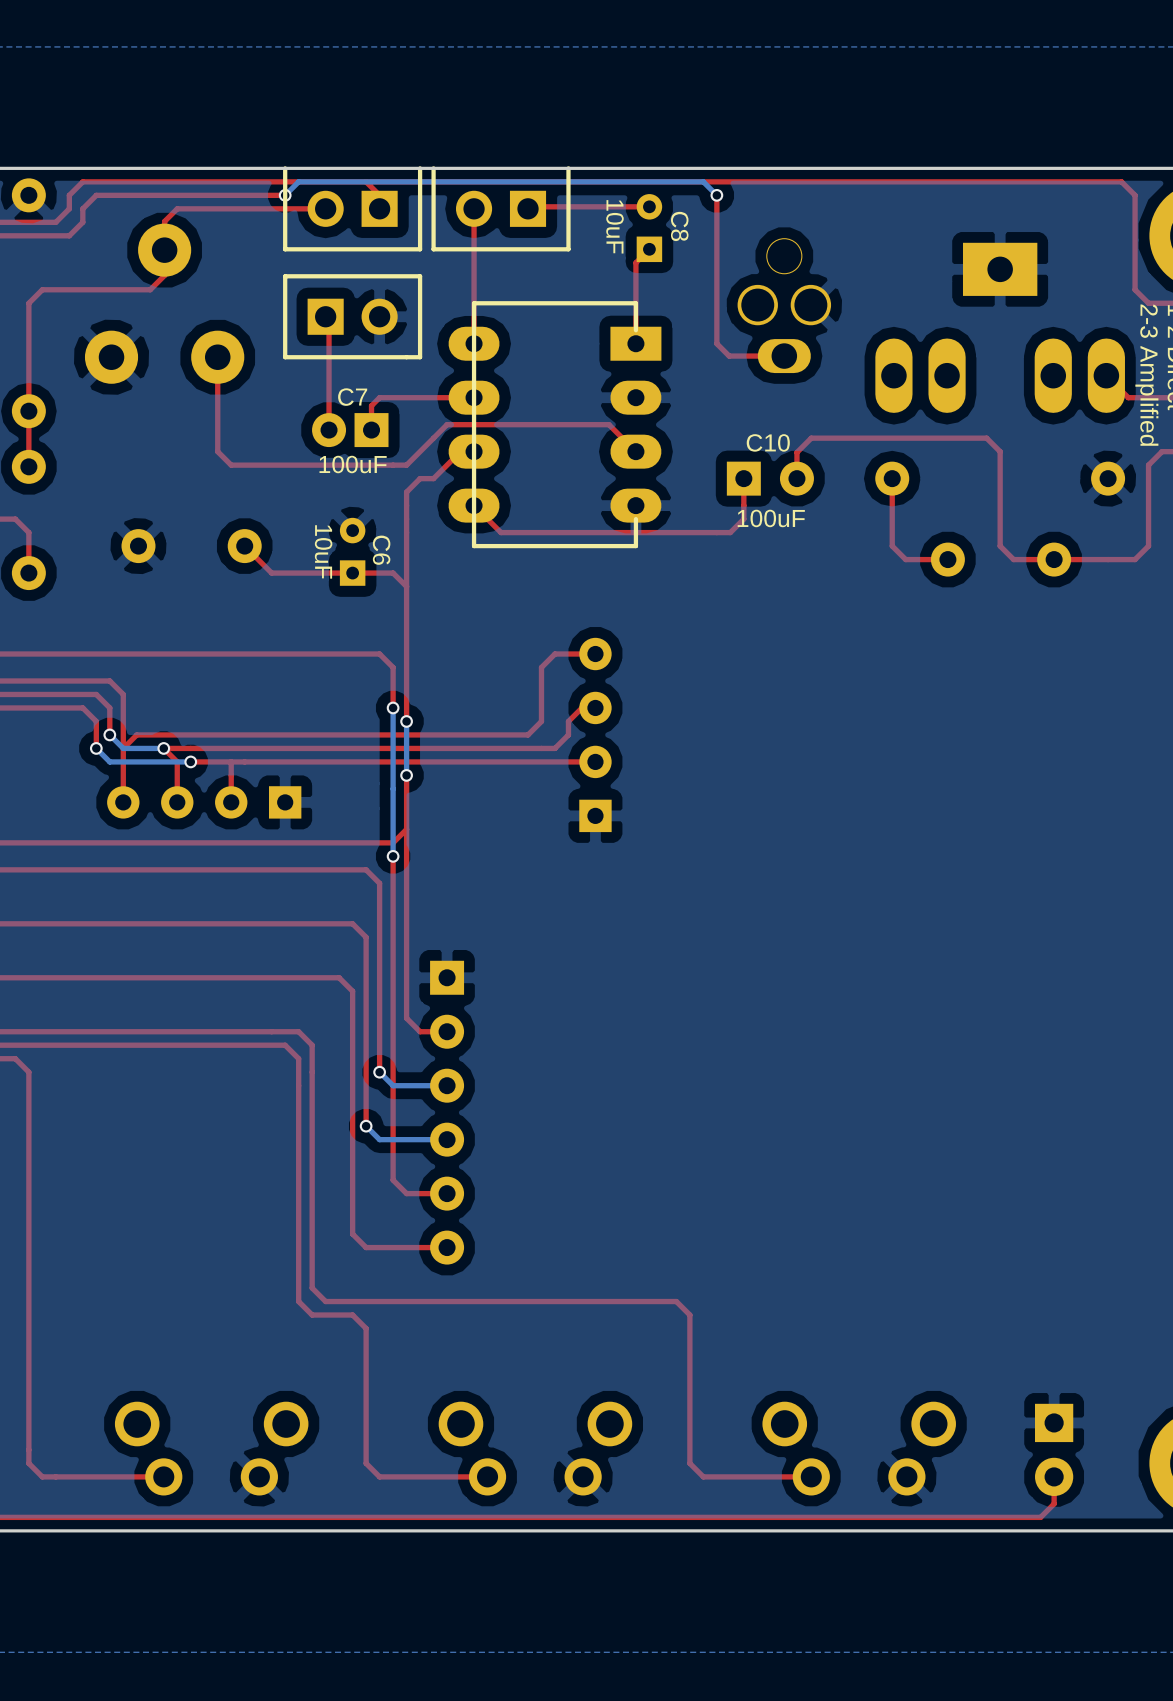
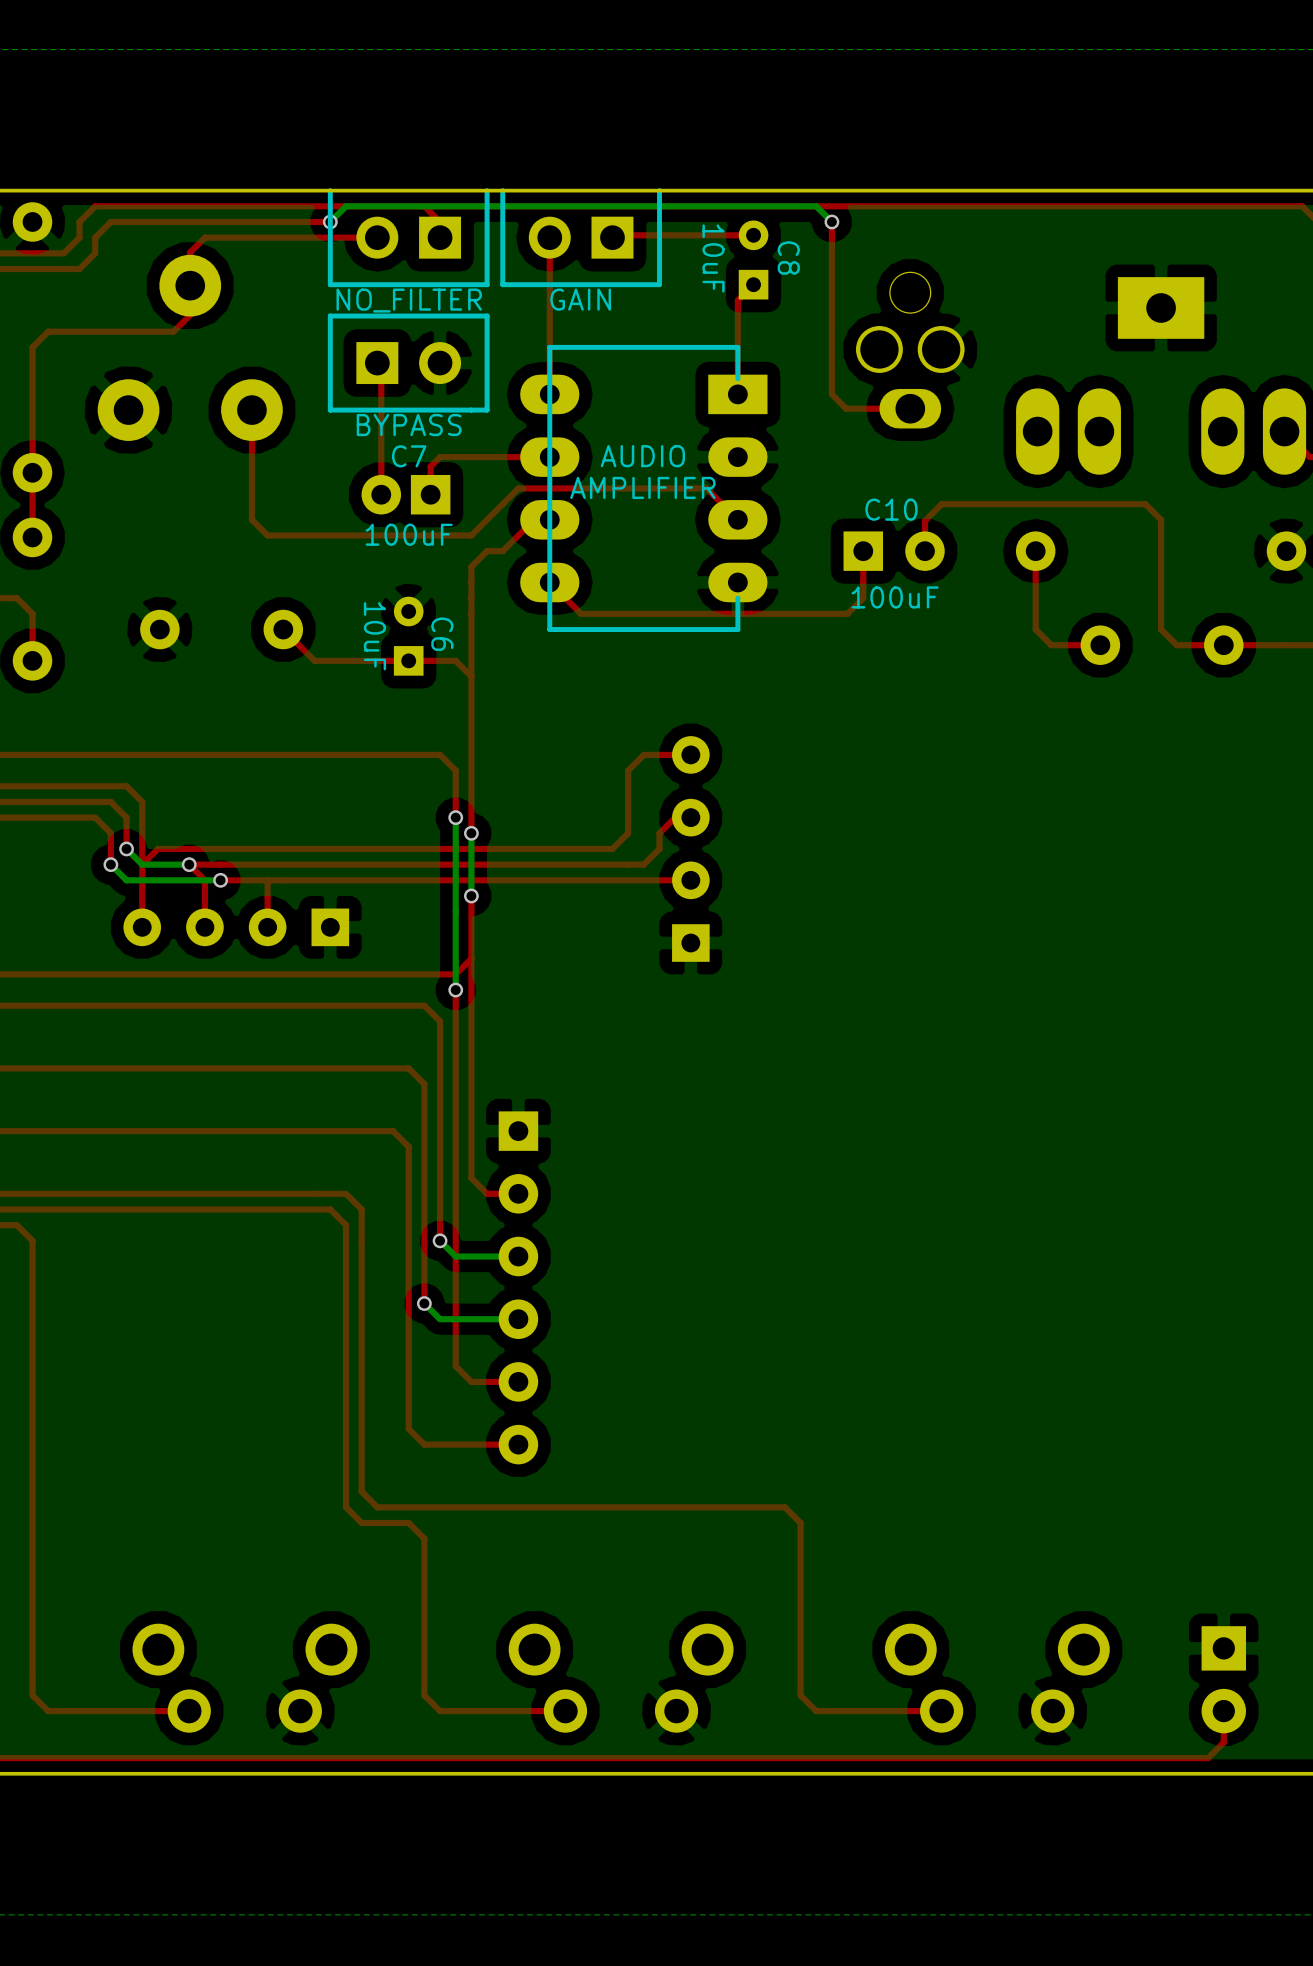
text: none -> GAIN (580, 299)
text: none -> NO_FILTER (409, 300)
text: none -> BYPASS (409, 425)
text: none -> AUDIO (642, 456)
text: none -> AMPLIFIER (642, 487)

